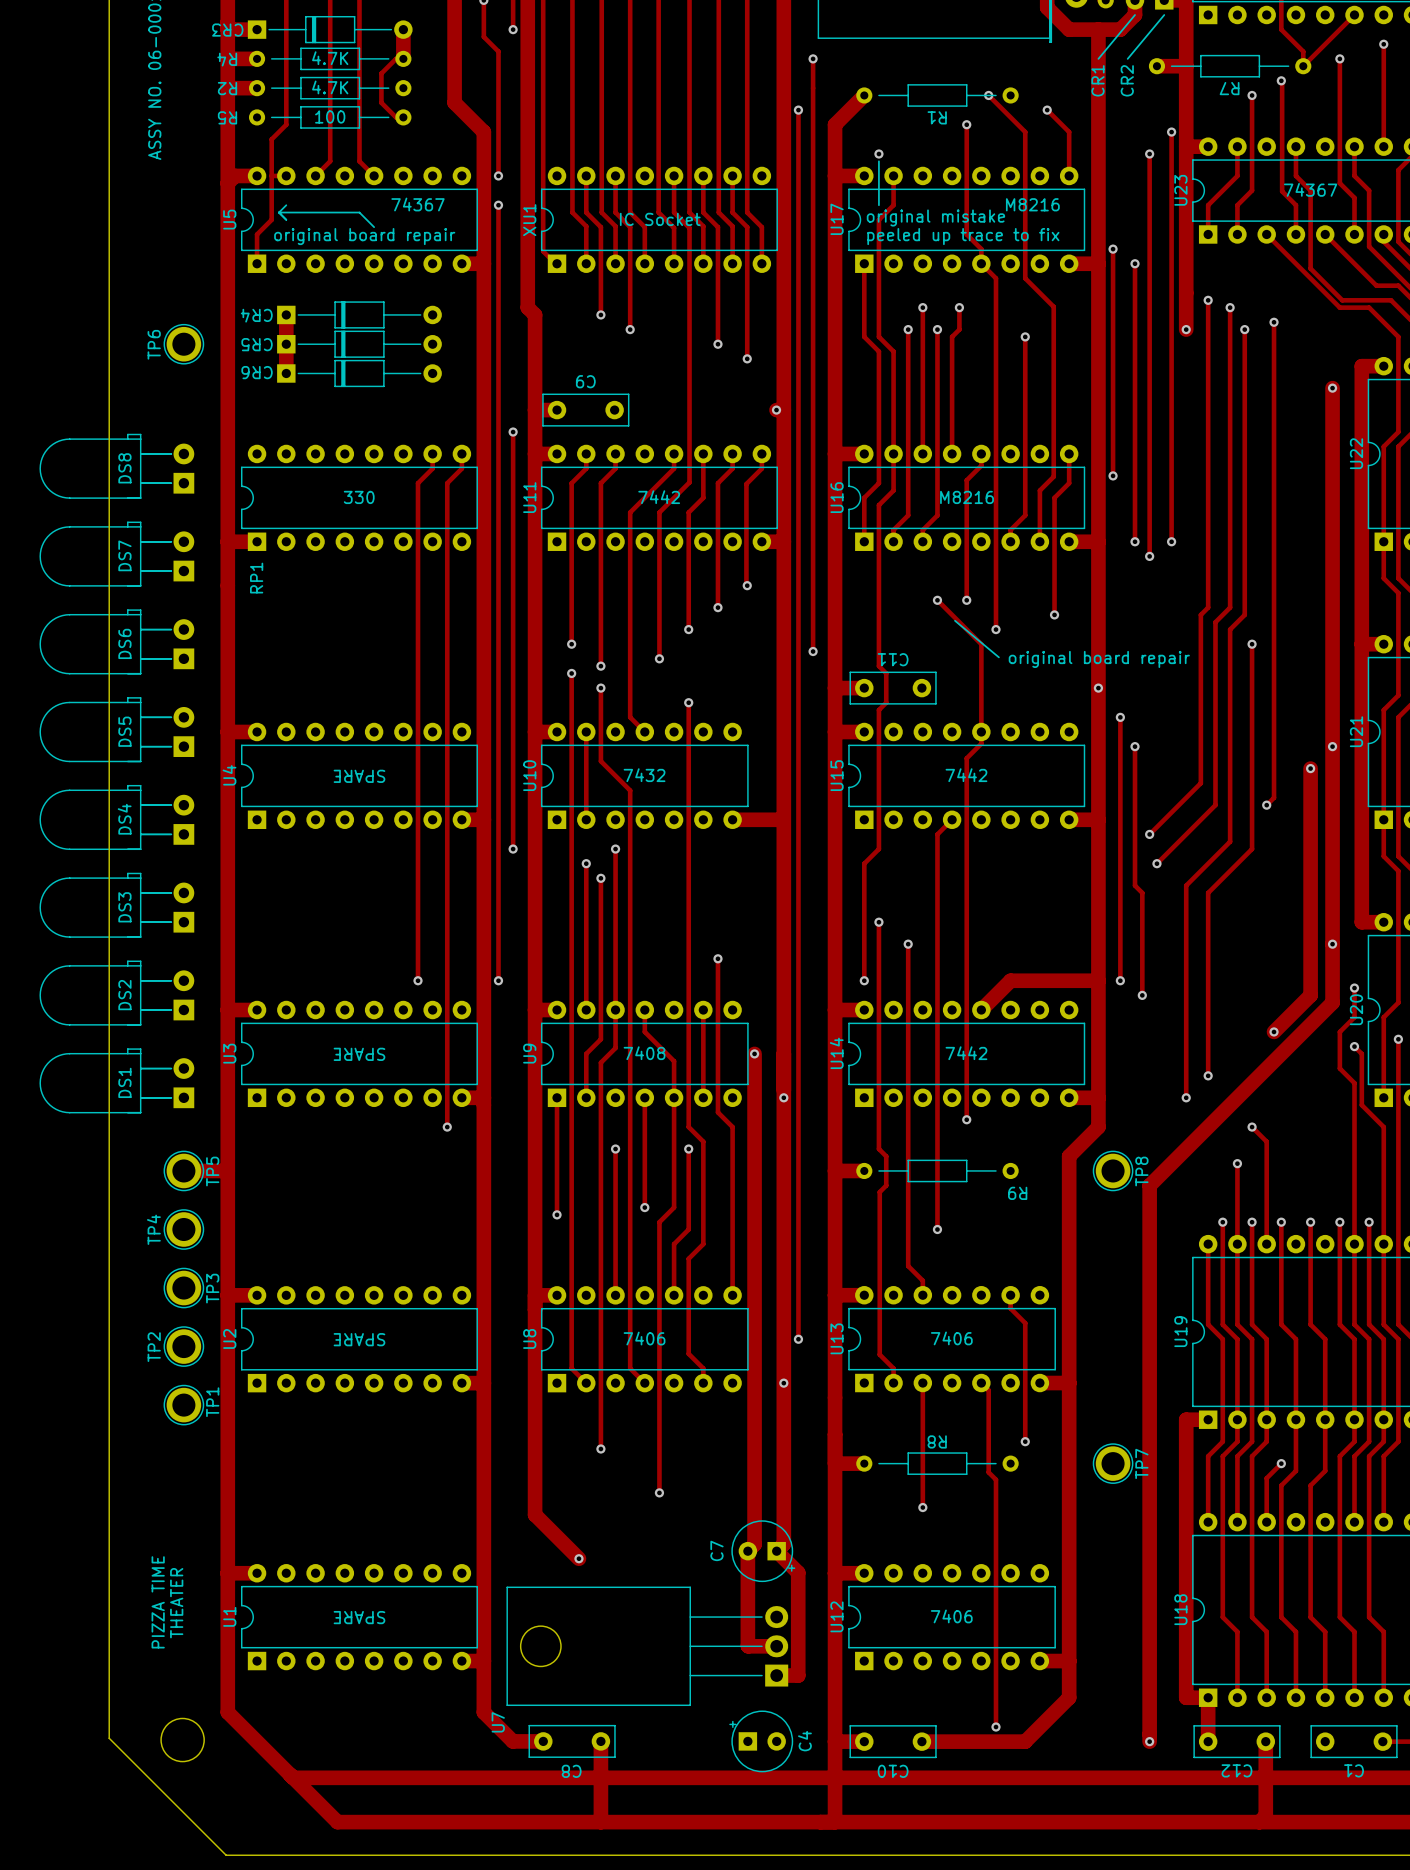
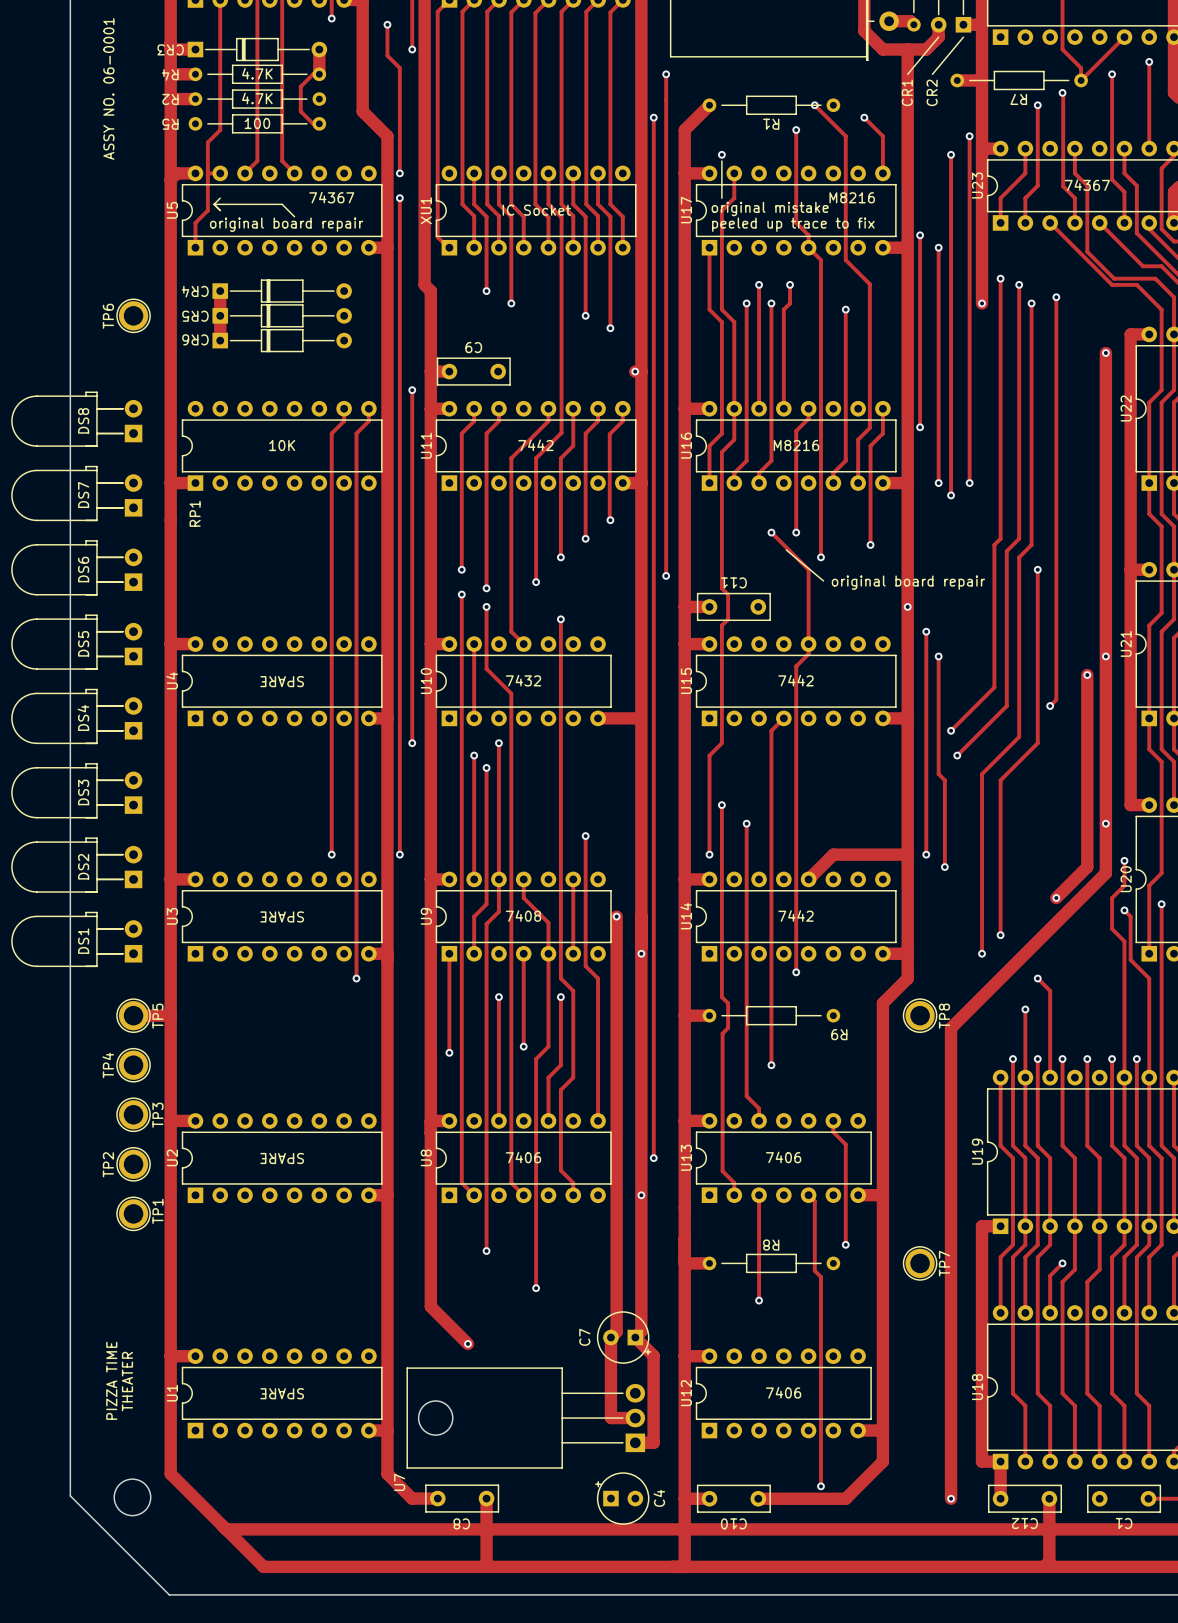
RP1 value: 330 (359, 497) -> 10K (282, 445)

